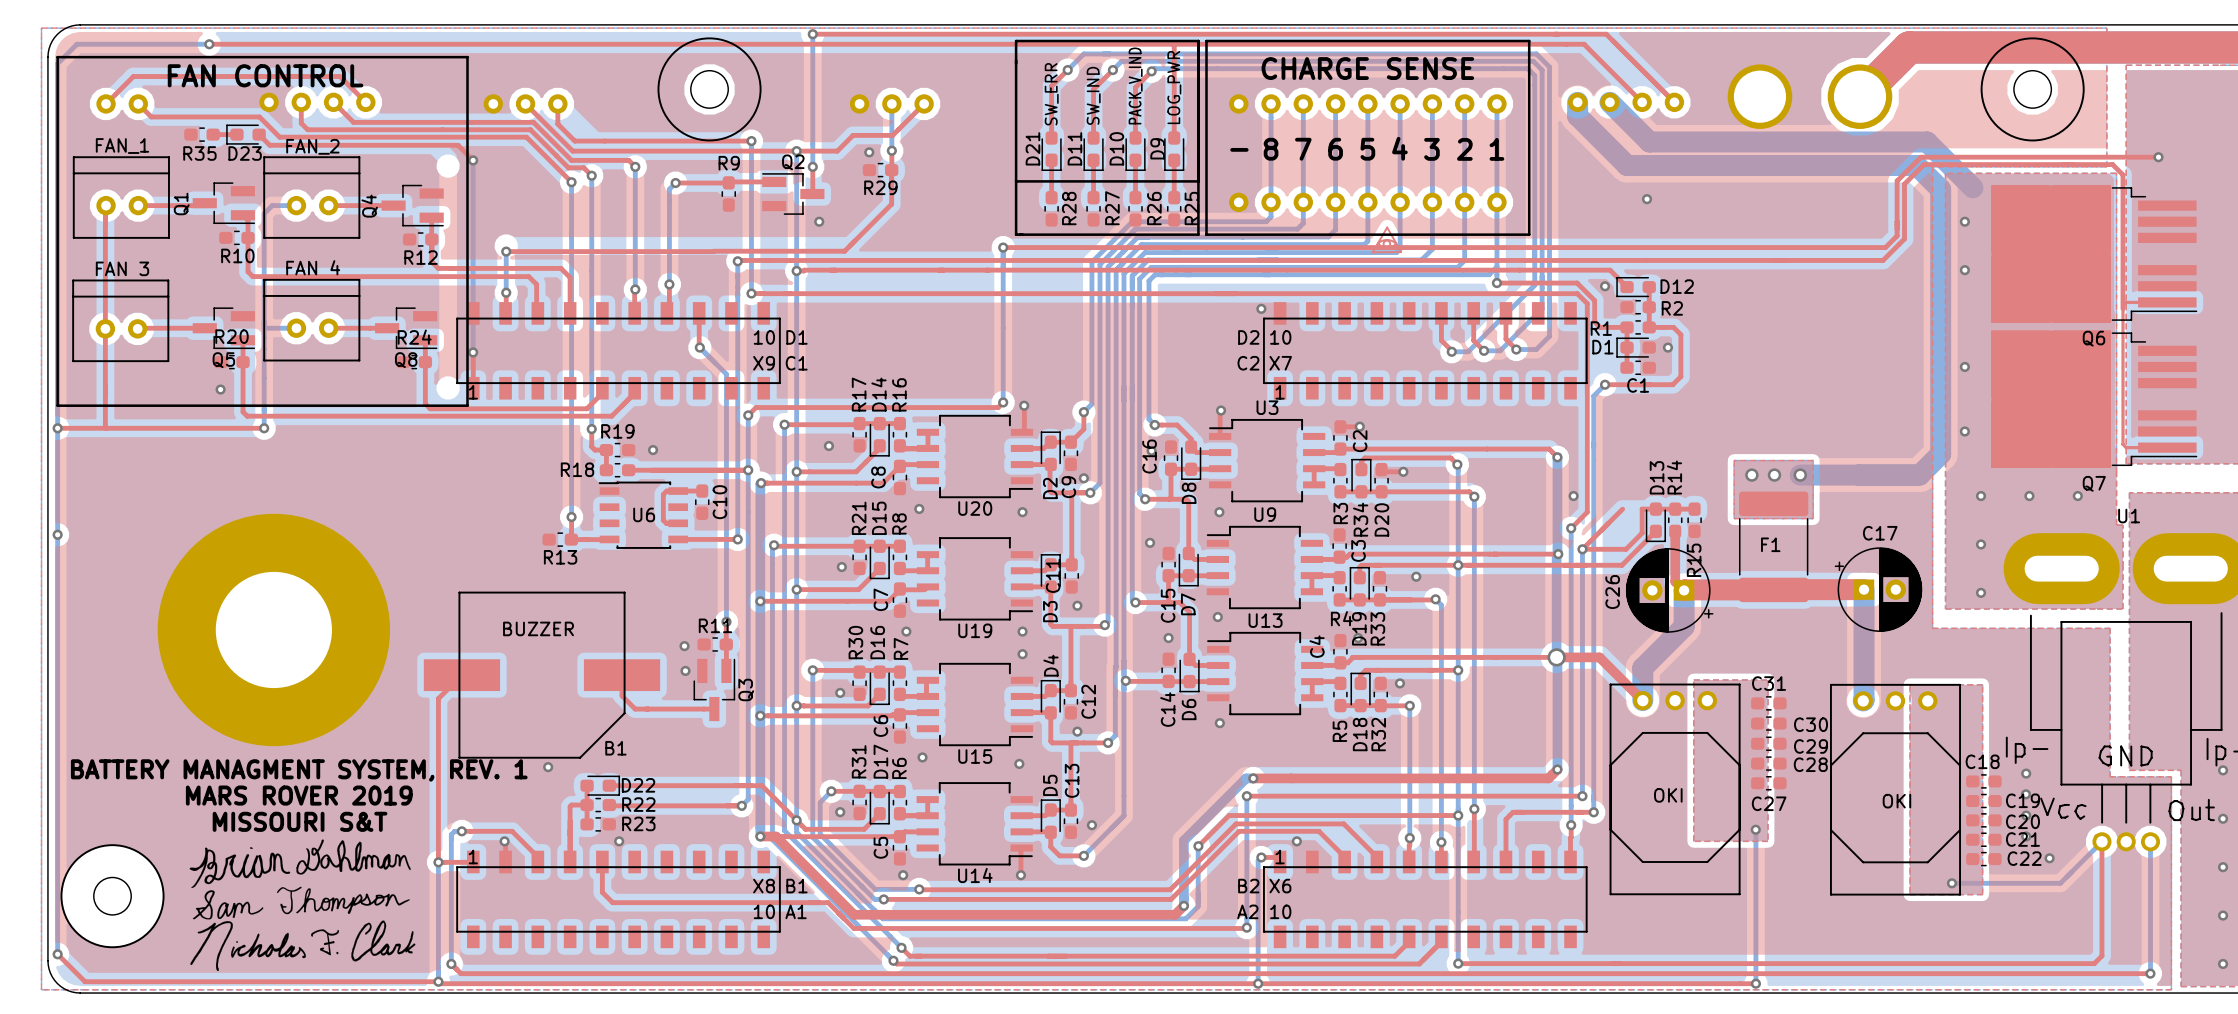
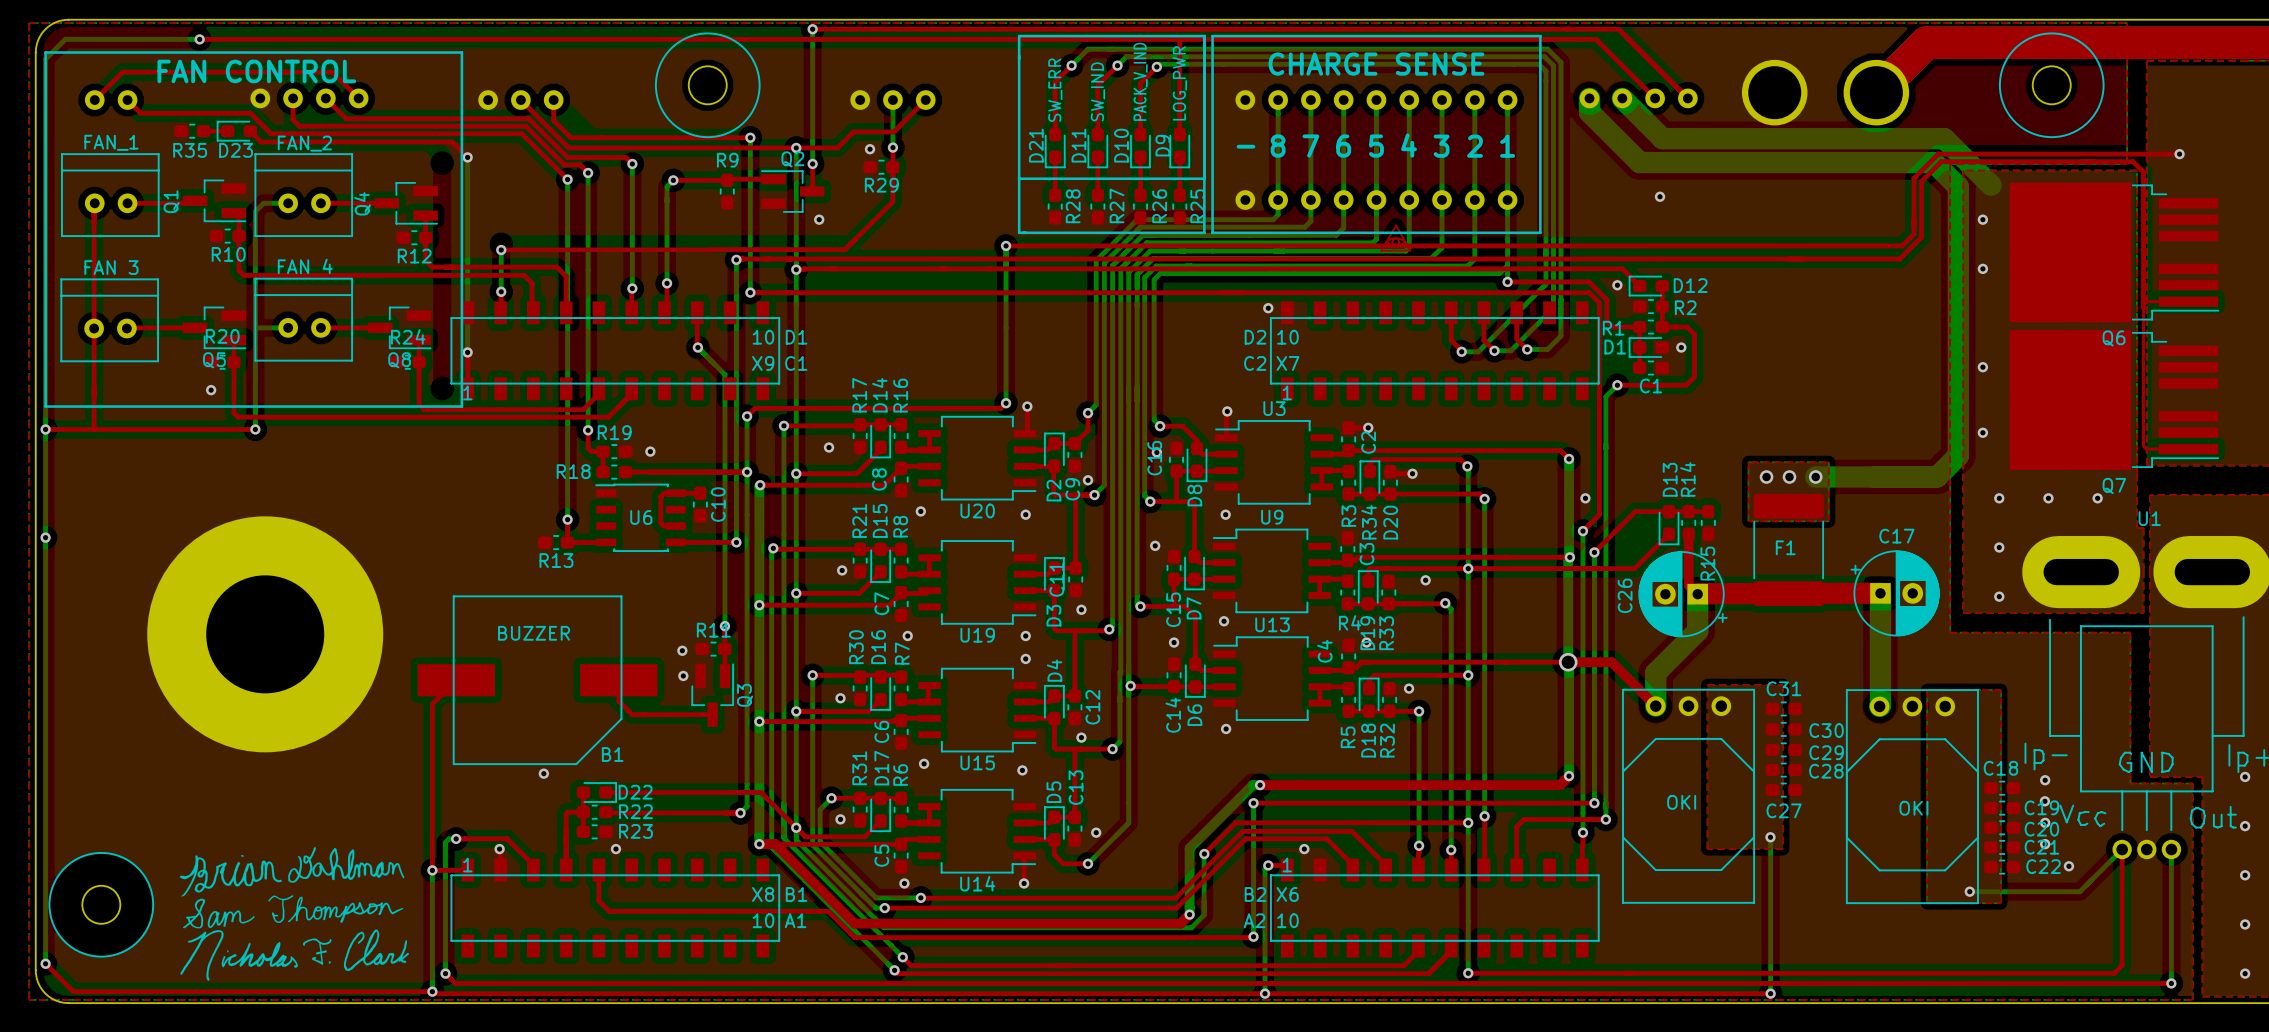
top track: (1642, 509) (1642, 533) (1626, 549) (1582, 549) -> (1655, 511) (1635, 511)
text: BATTERY MANAGMENT SYSTEM, REV. 1 (299, 770) -> none
text: MARS ROVER 2019 (299, 795) -> none
text: MISSOURI S&T (300, 821) -> none

